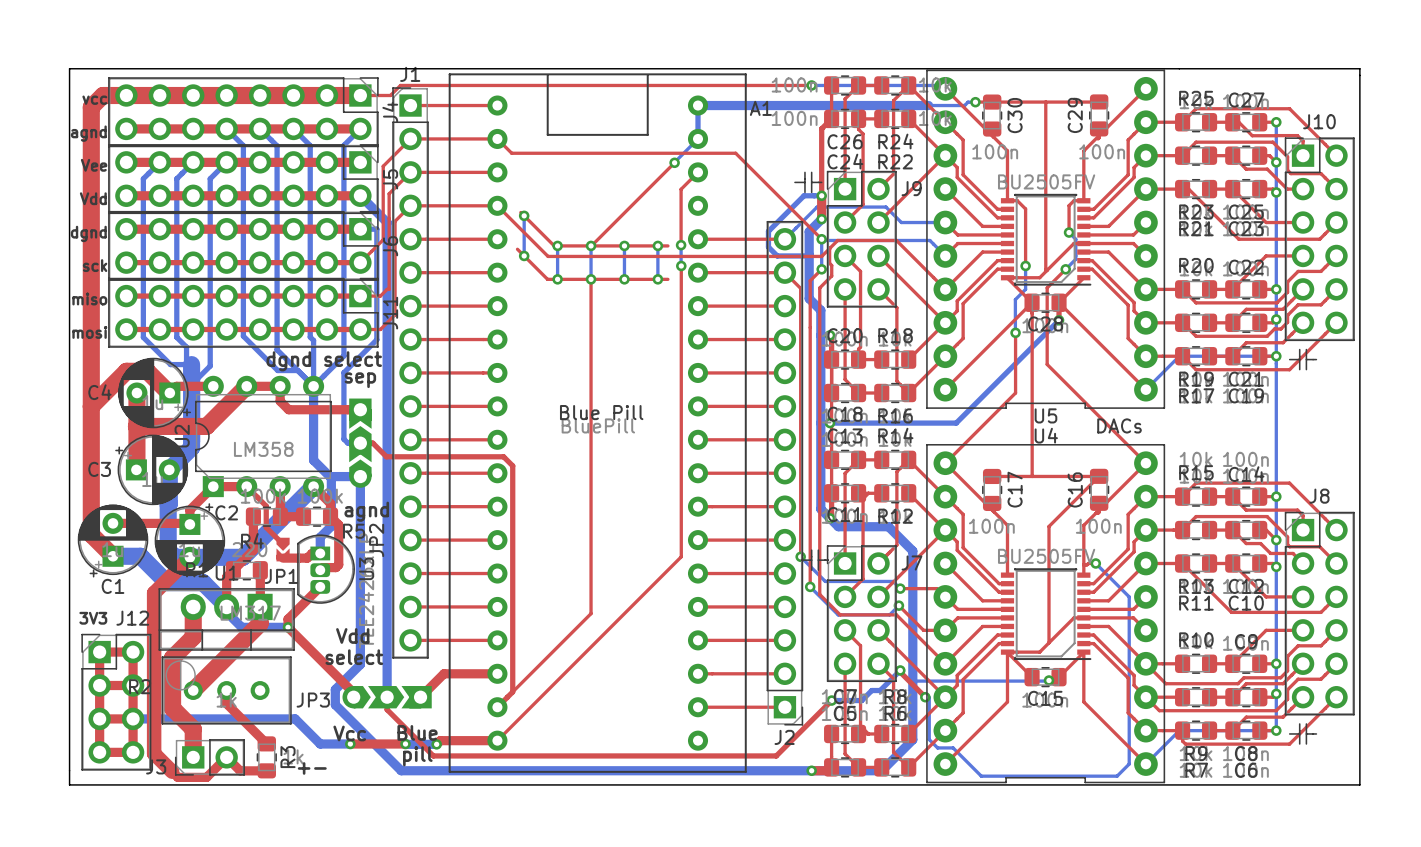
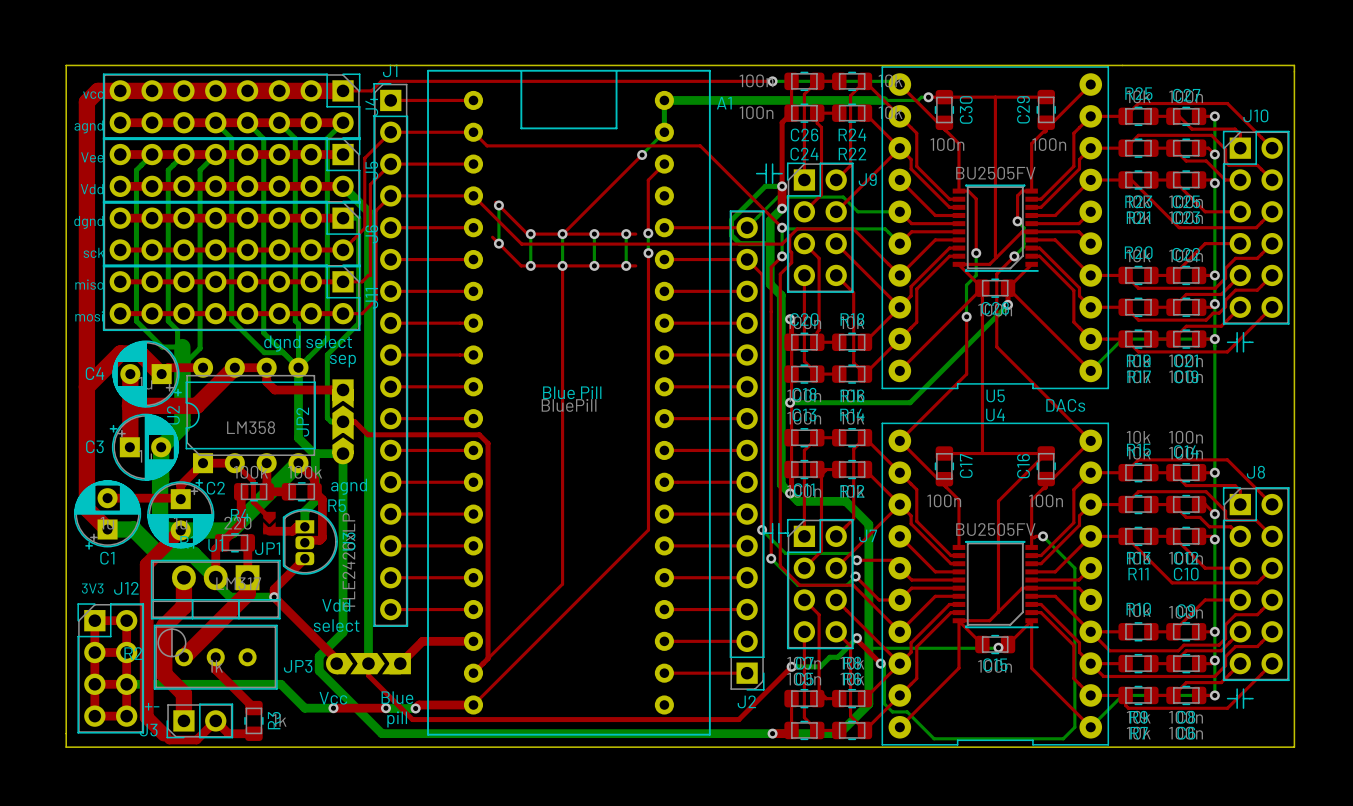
JP2 name position: JP2 (376, 540) -> JP2 (302, 422)
text position: +- (312, 768) -> +- (152, 706)

